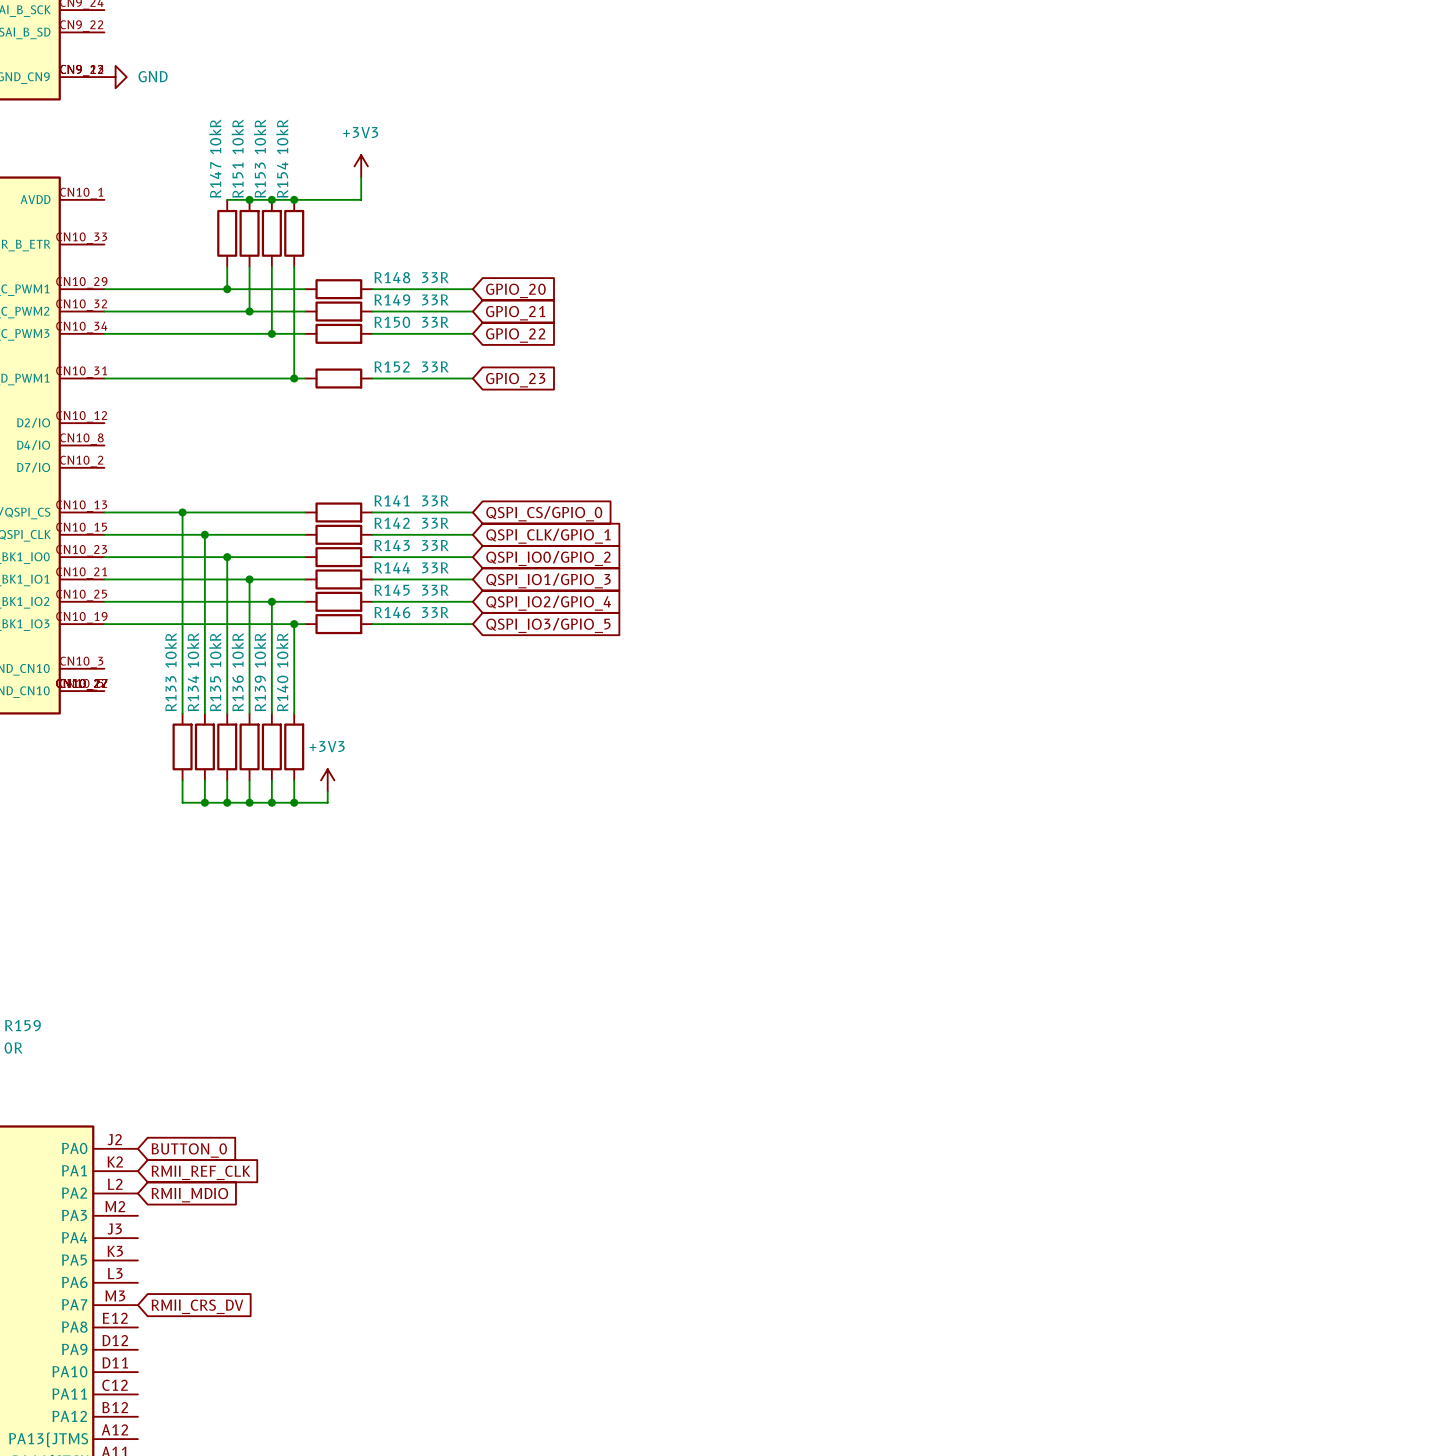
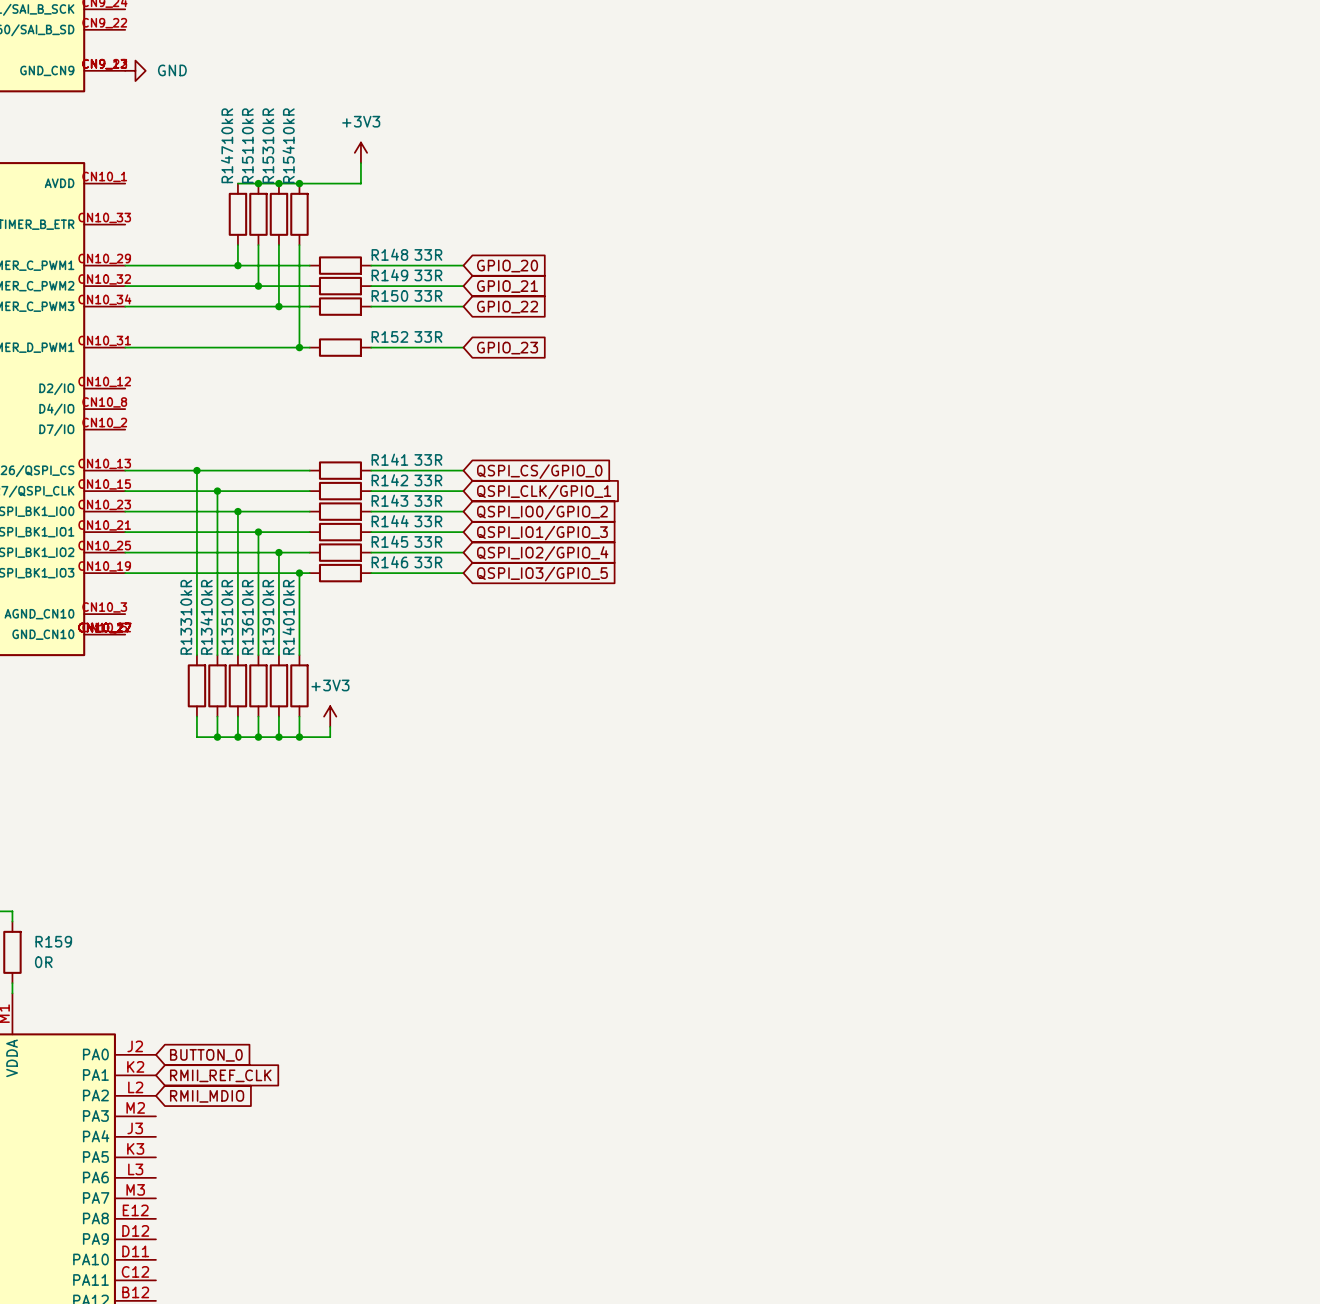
global label: RMII_CRS_DV (197, 1306) -> none

